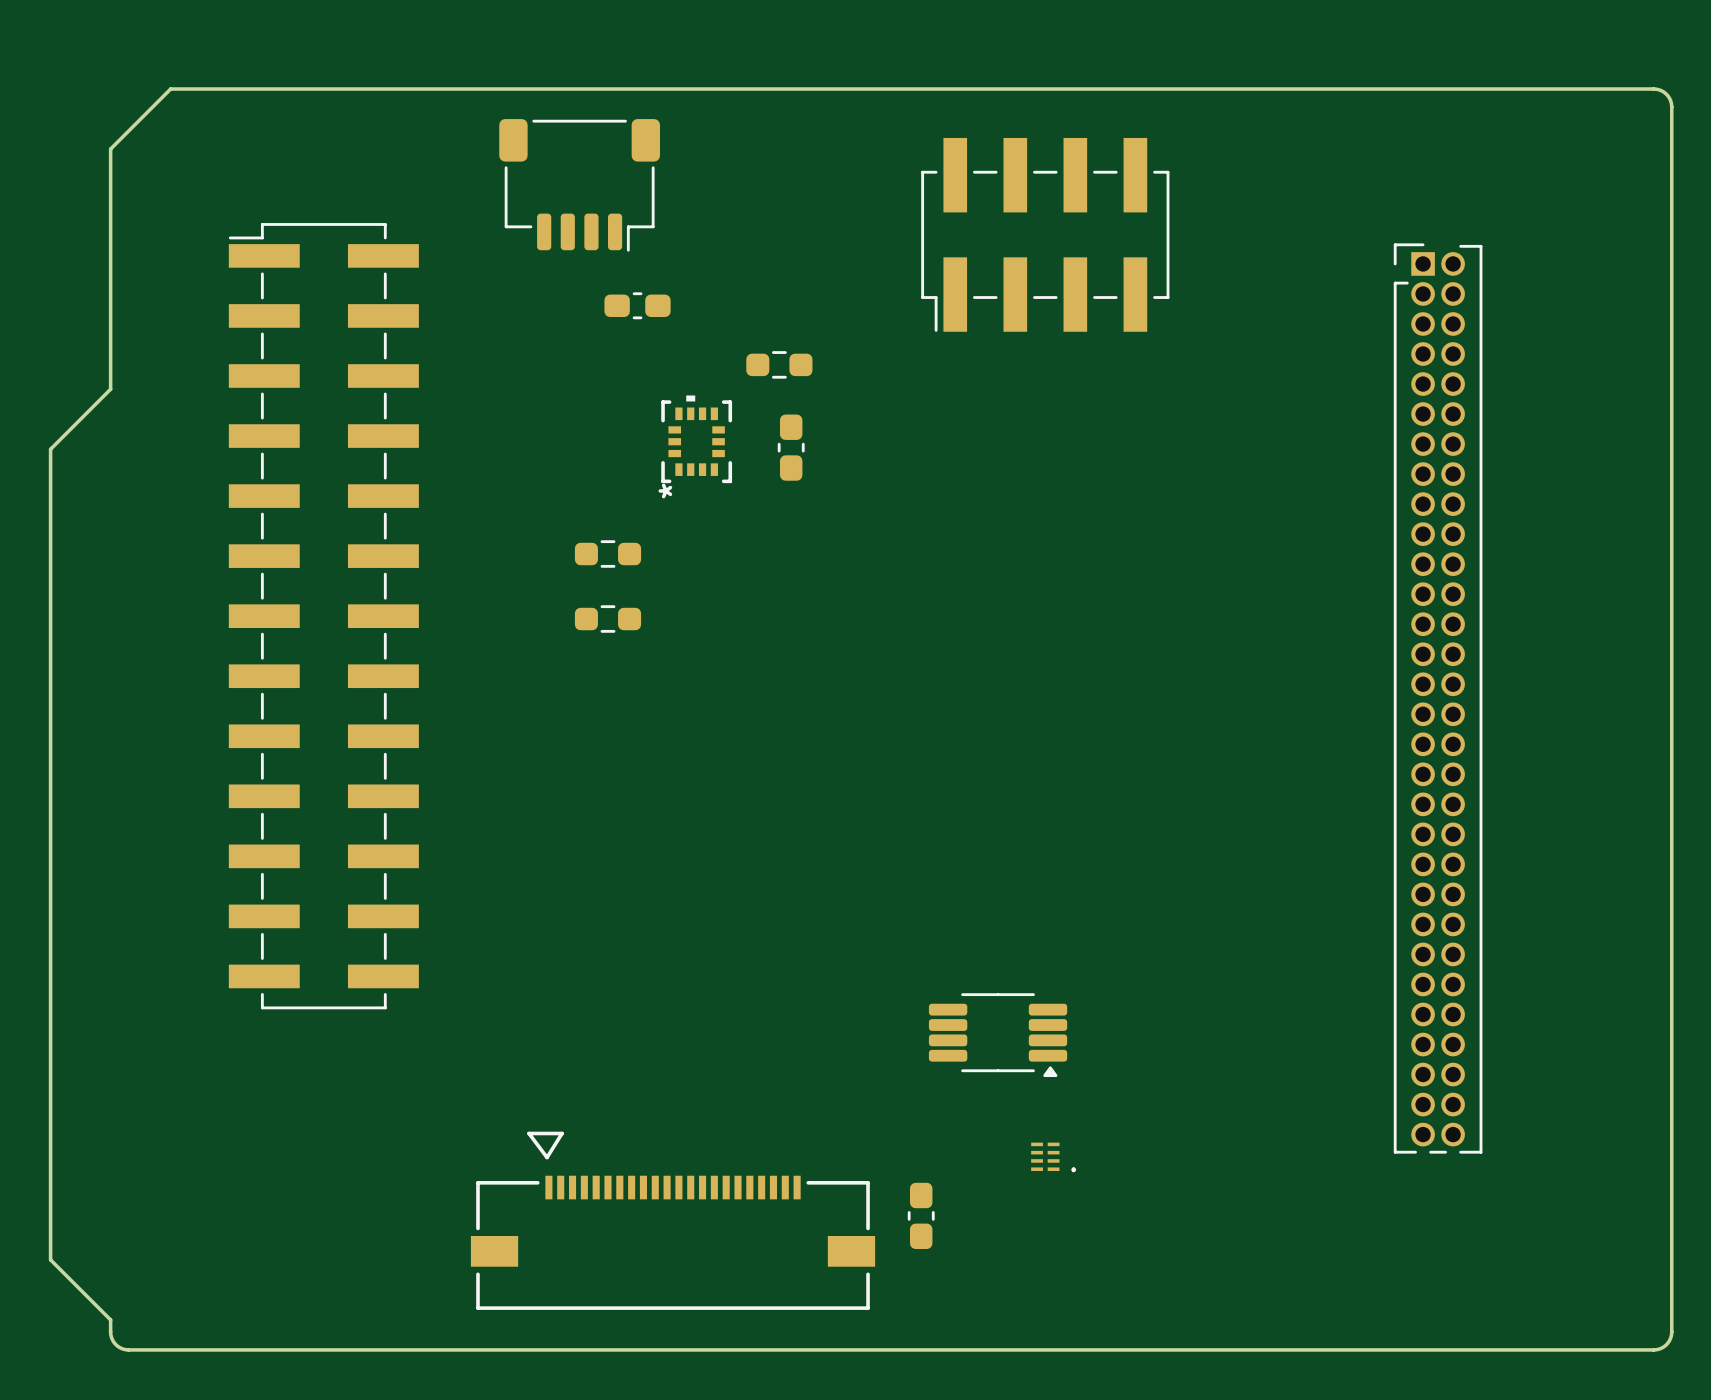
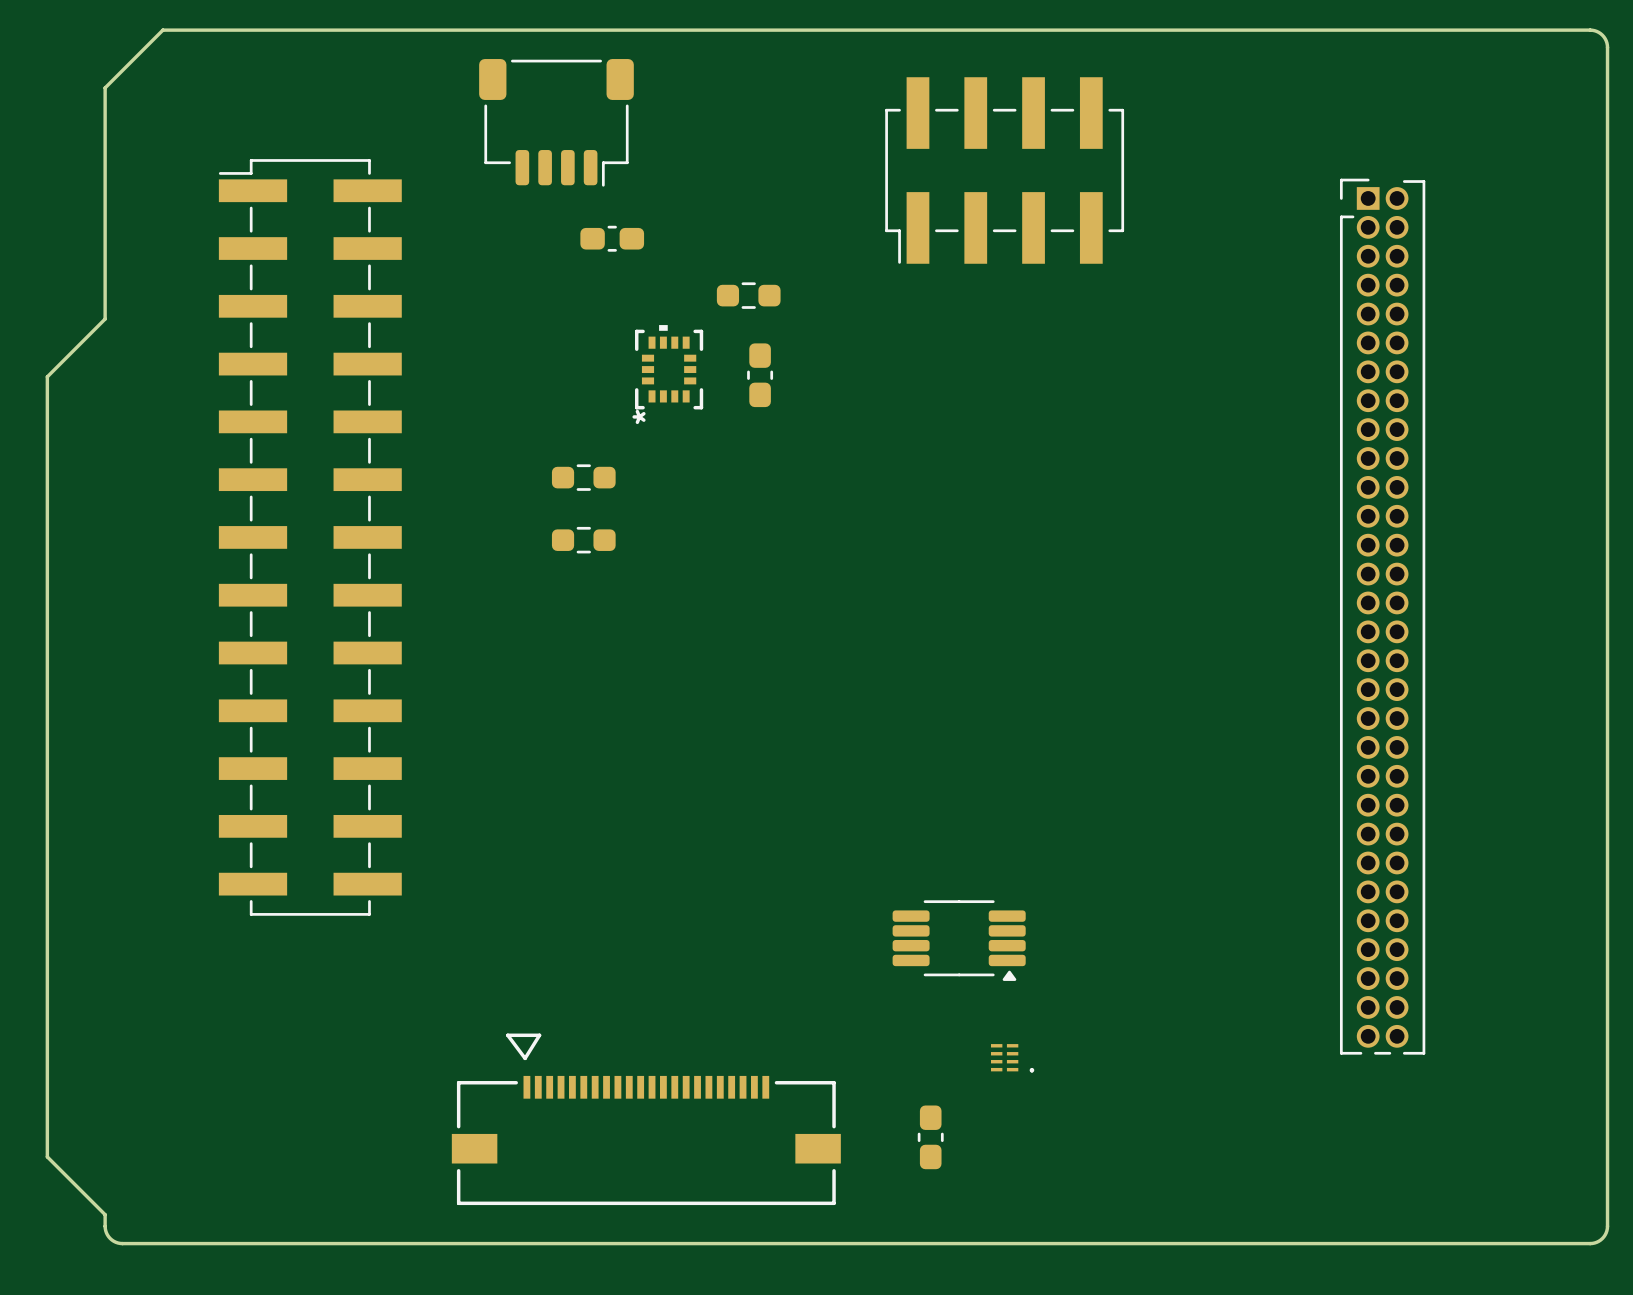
part position: (921, 1215) -> (930, 1137)

